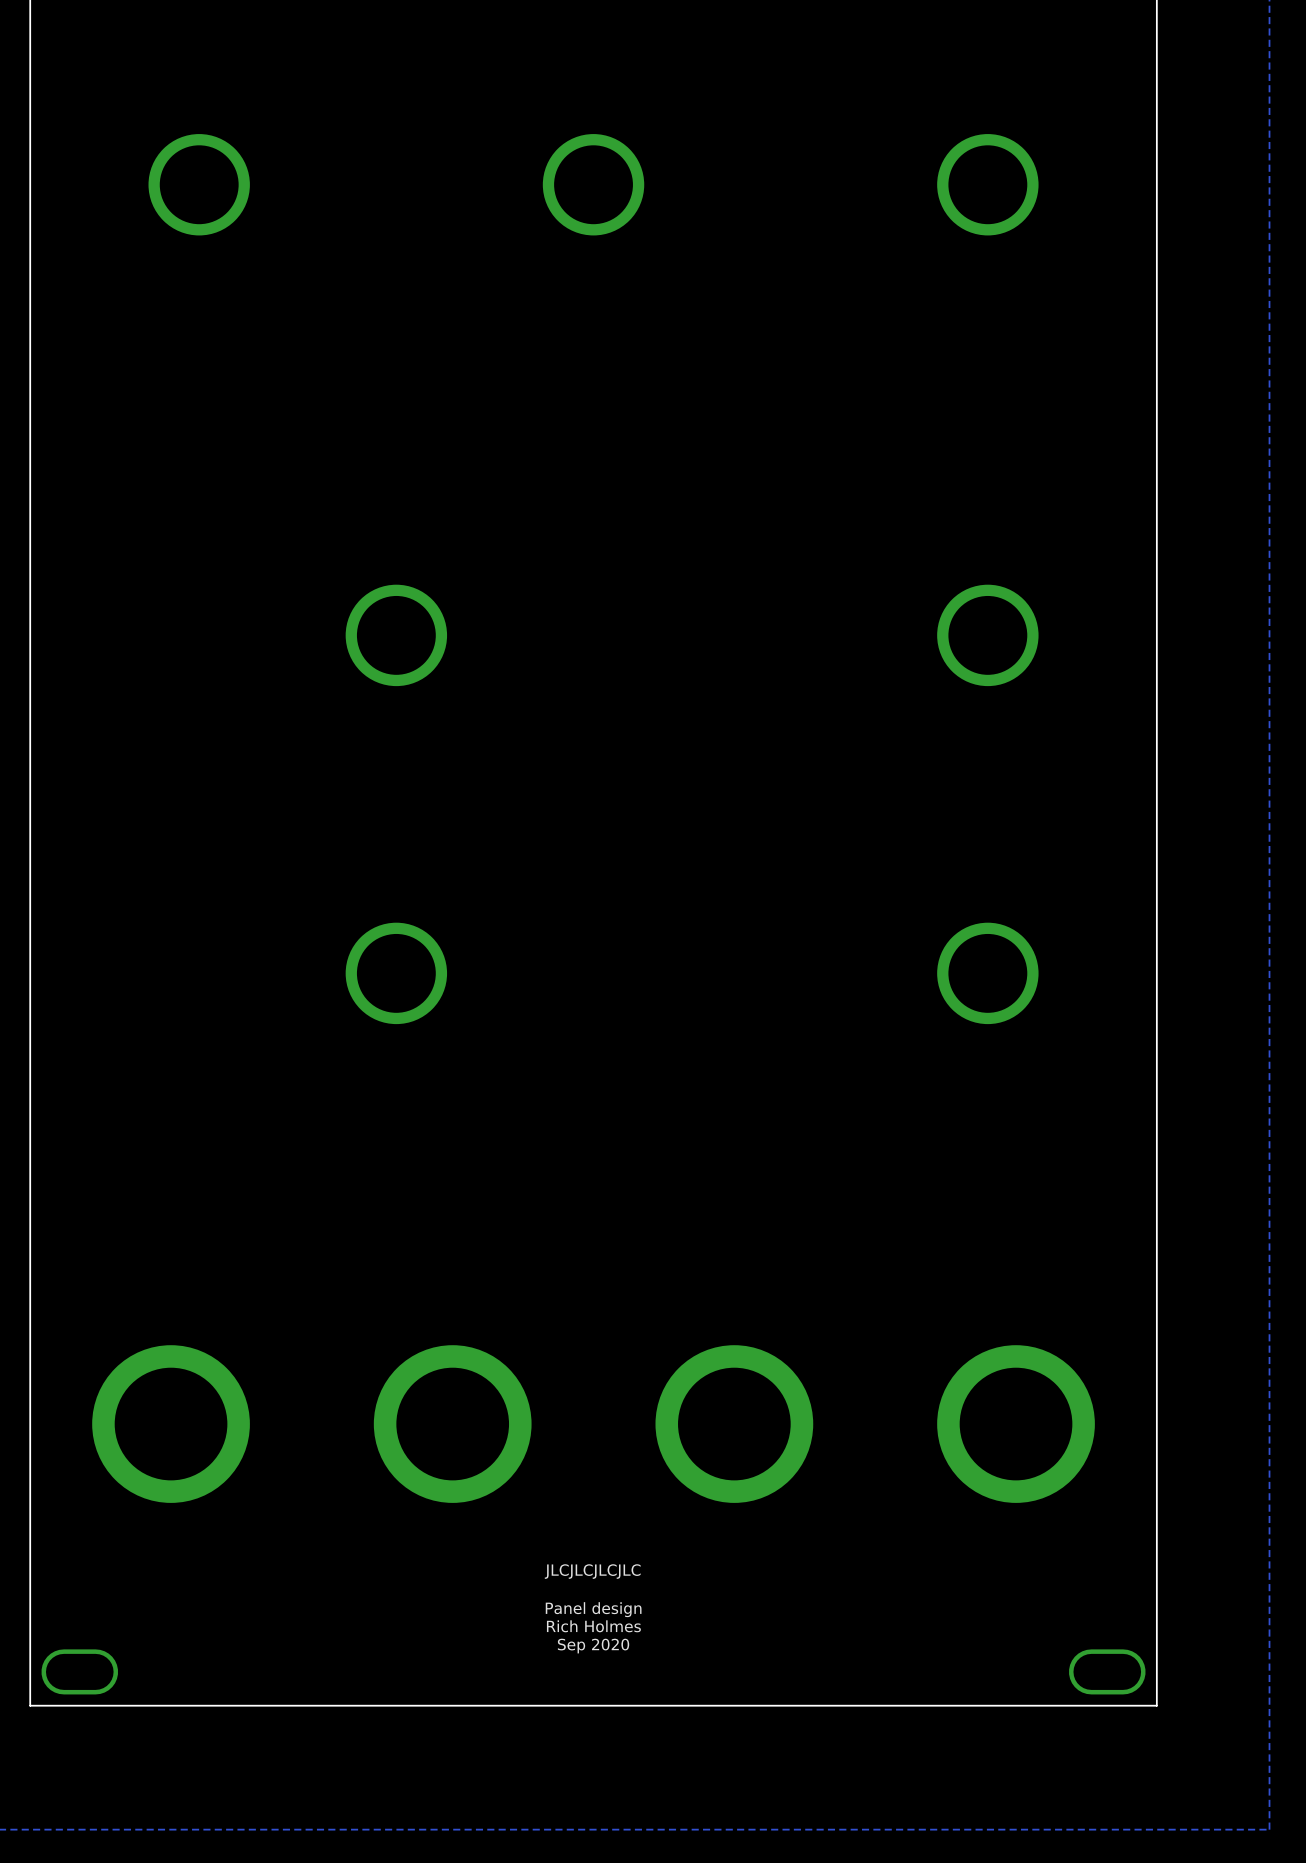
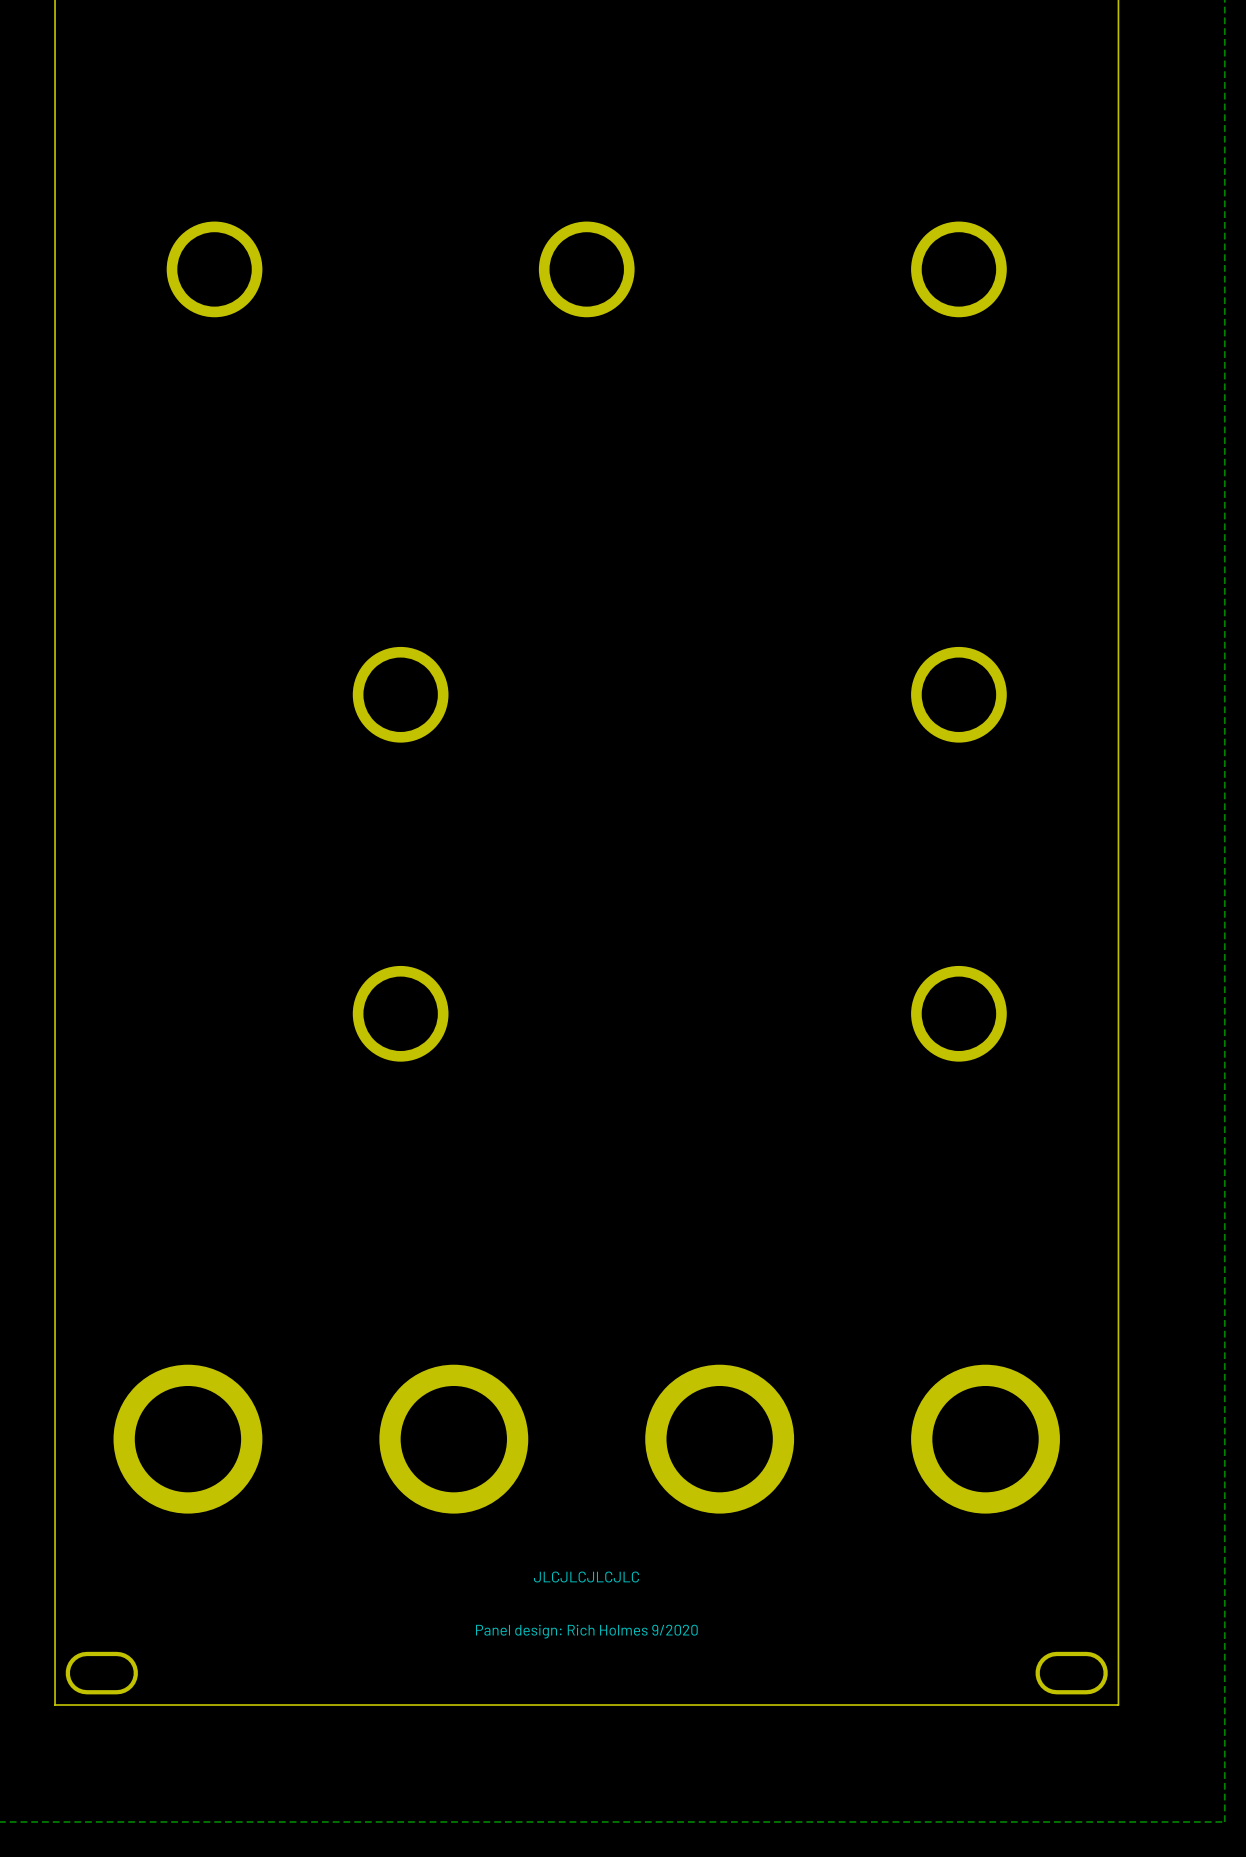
text: Panel design (593, 1609) -> none
text: Rich Holmes (593, 1626) -> Panel design: Rich Holmes 9/2020 (586, 1631)
text: Sep 2020 (593, 1646) -> none

